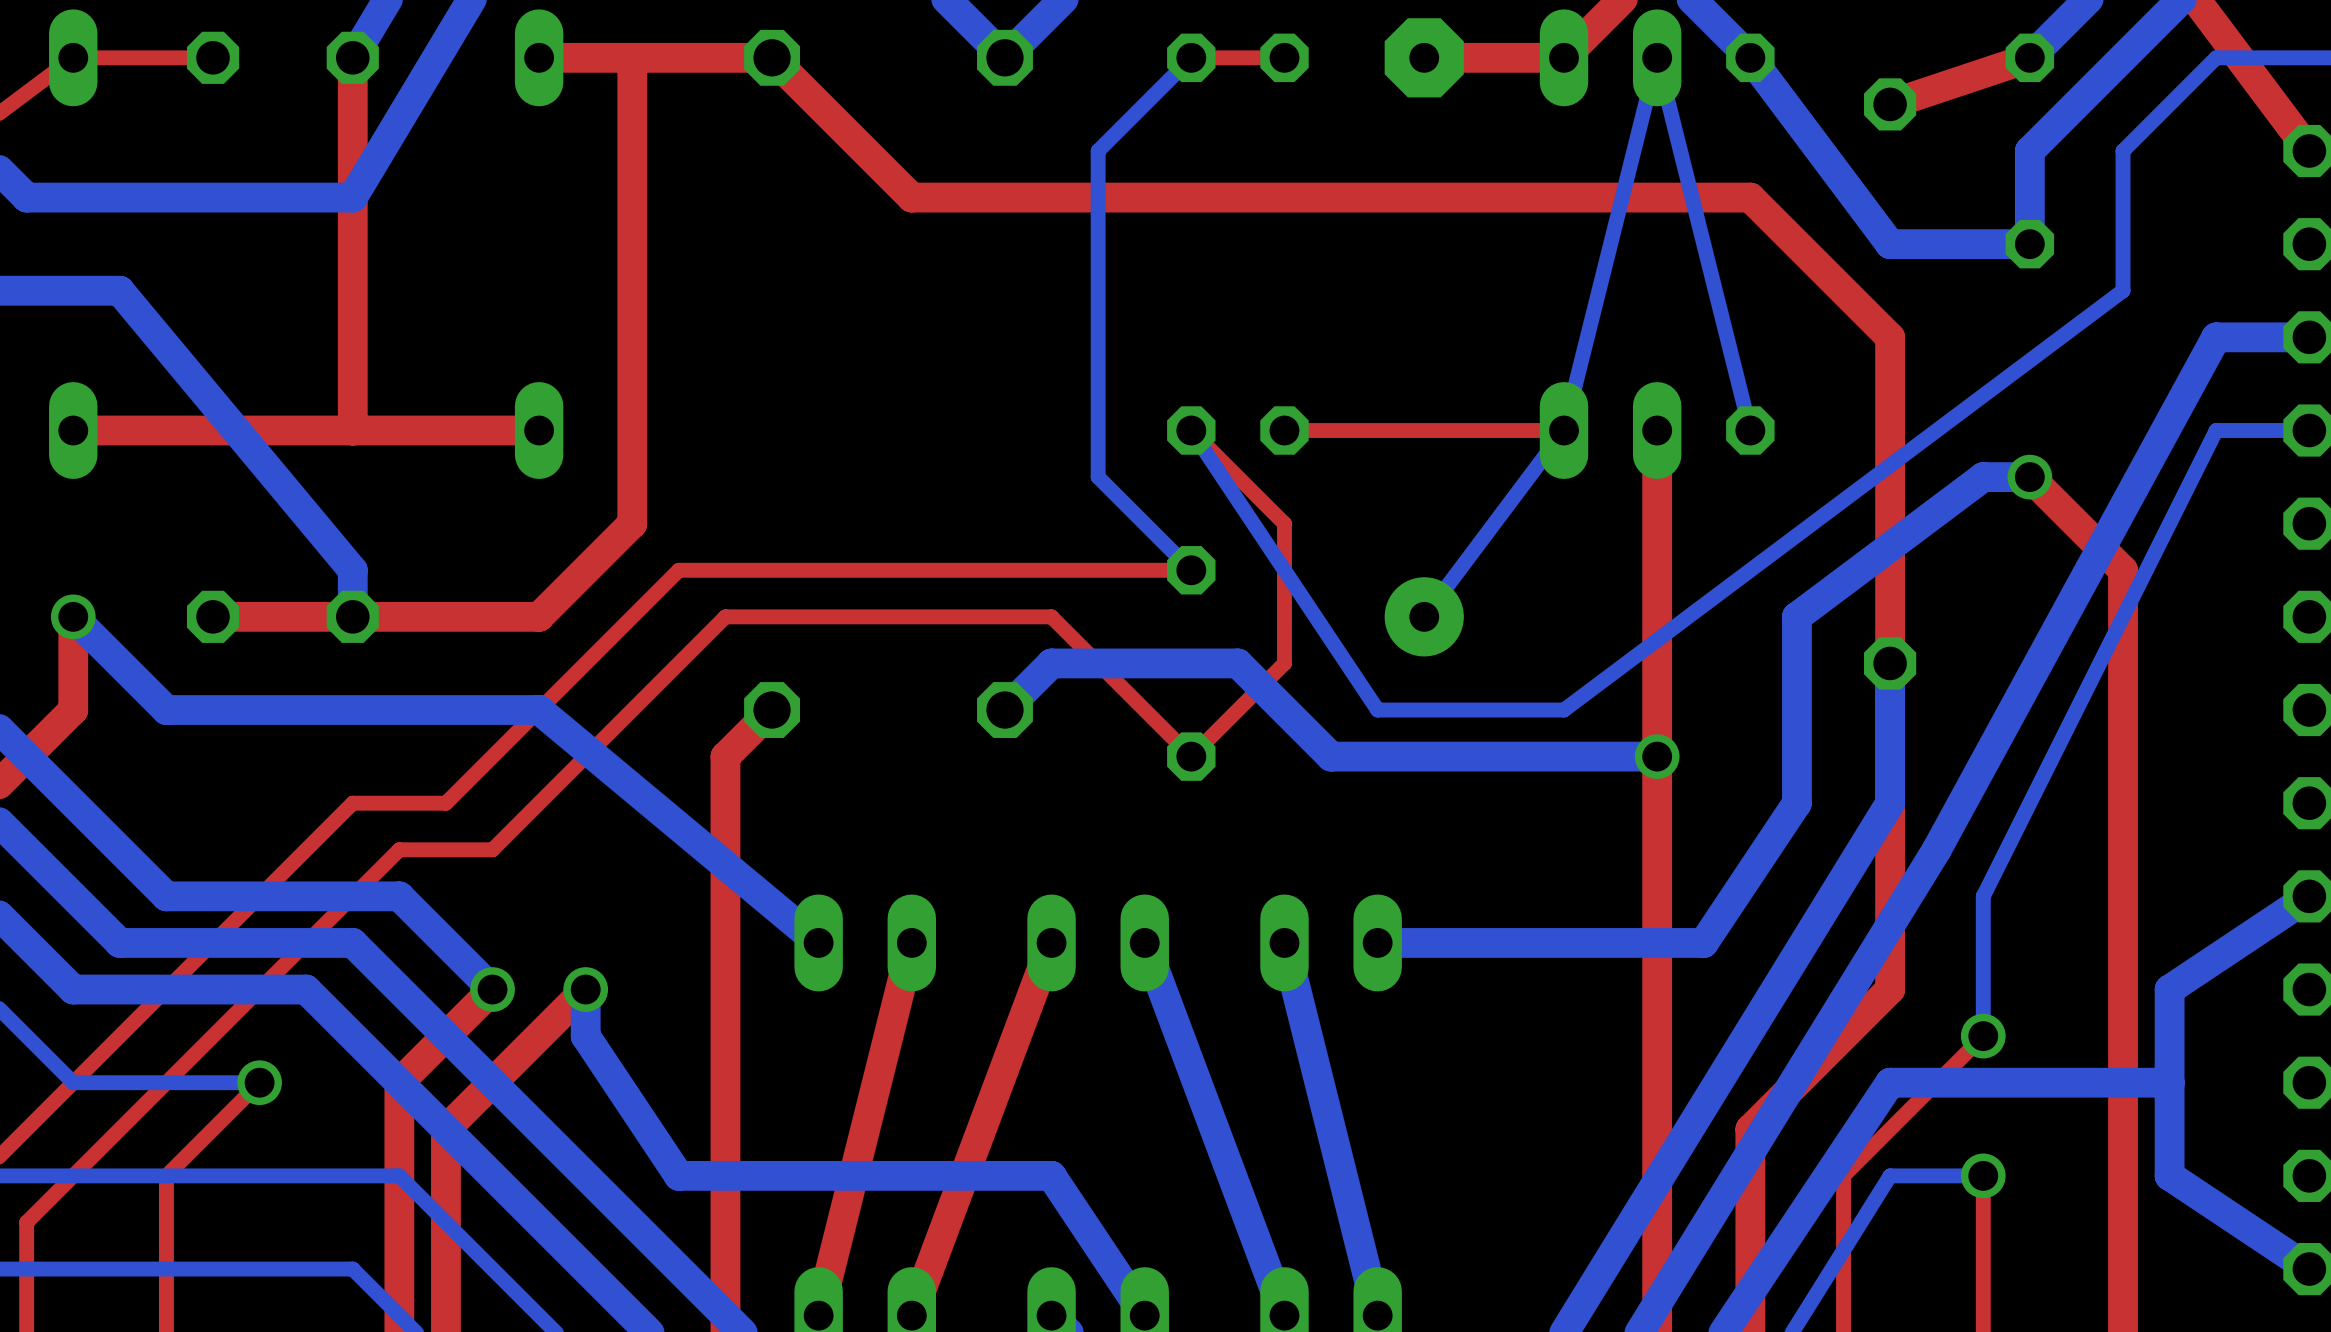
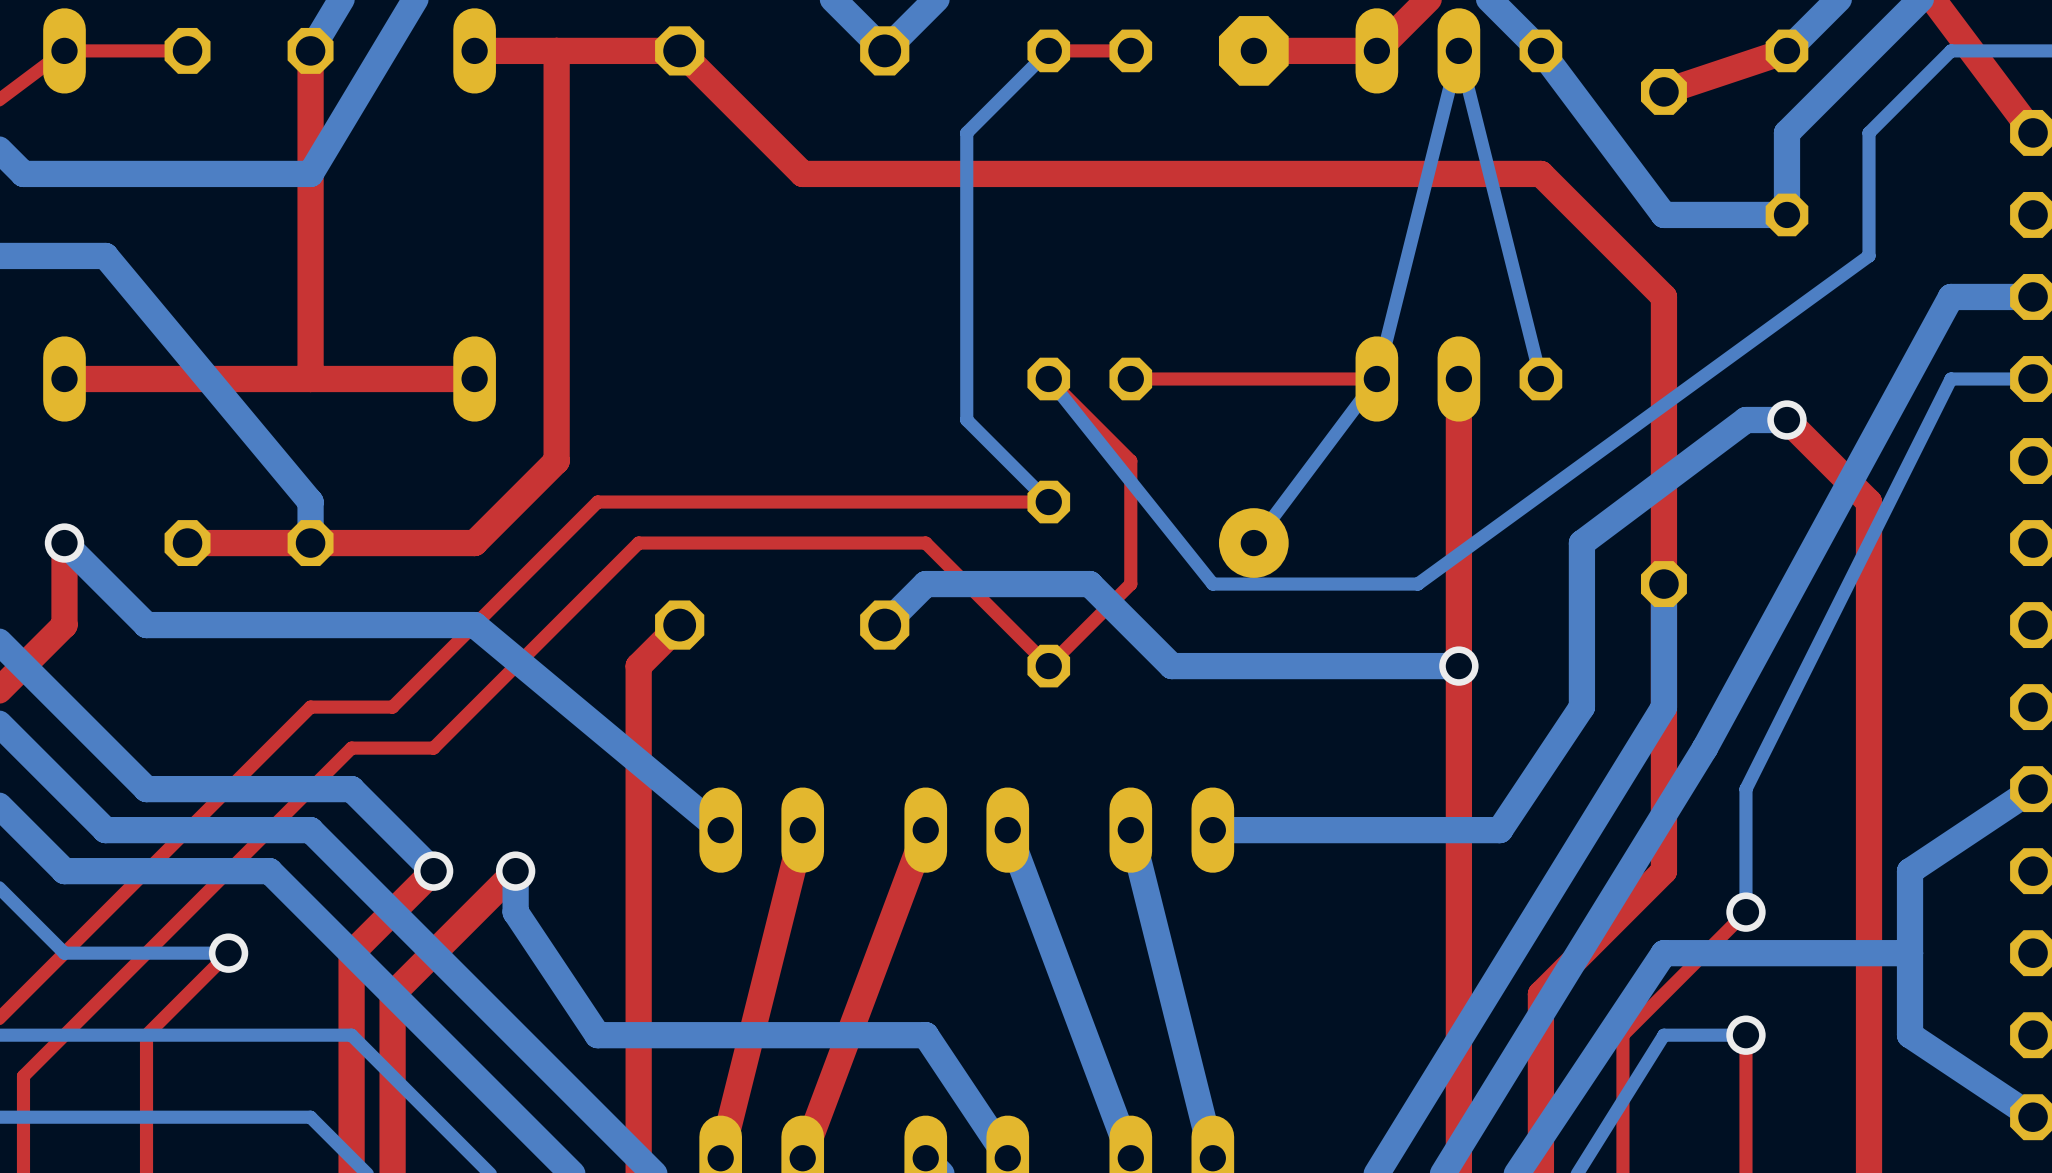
bottom track: (2123, 290) (1564, 710) (1377, 710) (1191, 430) -> (1869, 255) (1417, 584) (1212, 584) (1048, 379)

